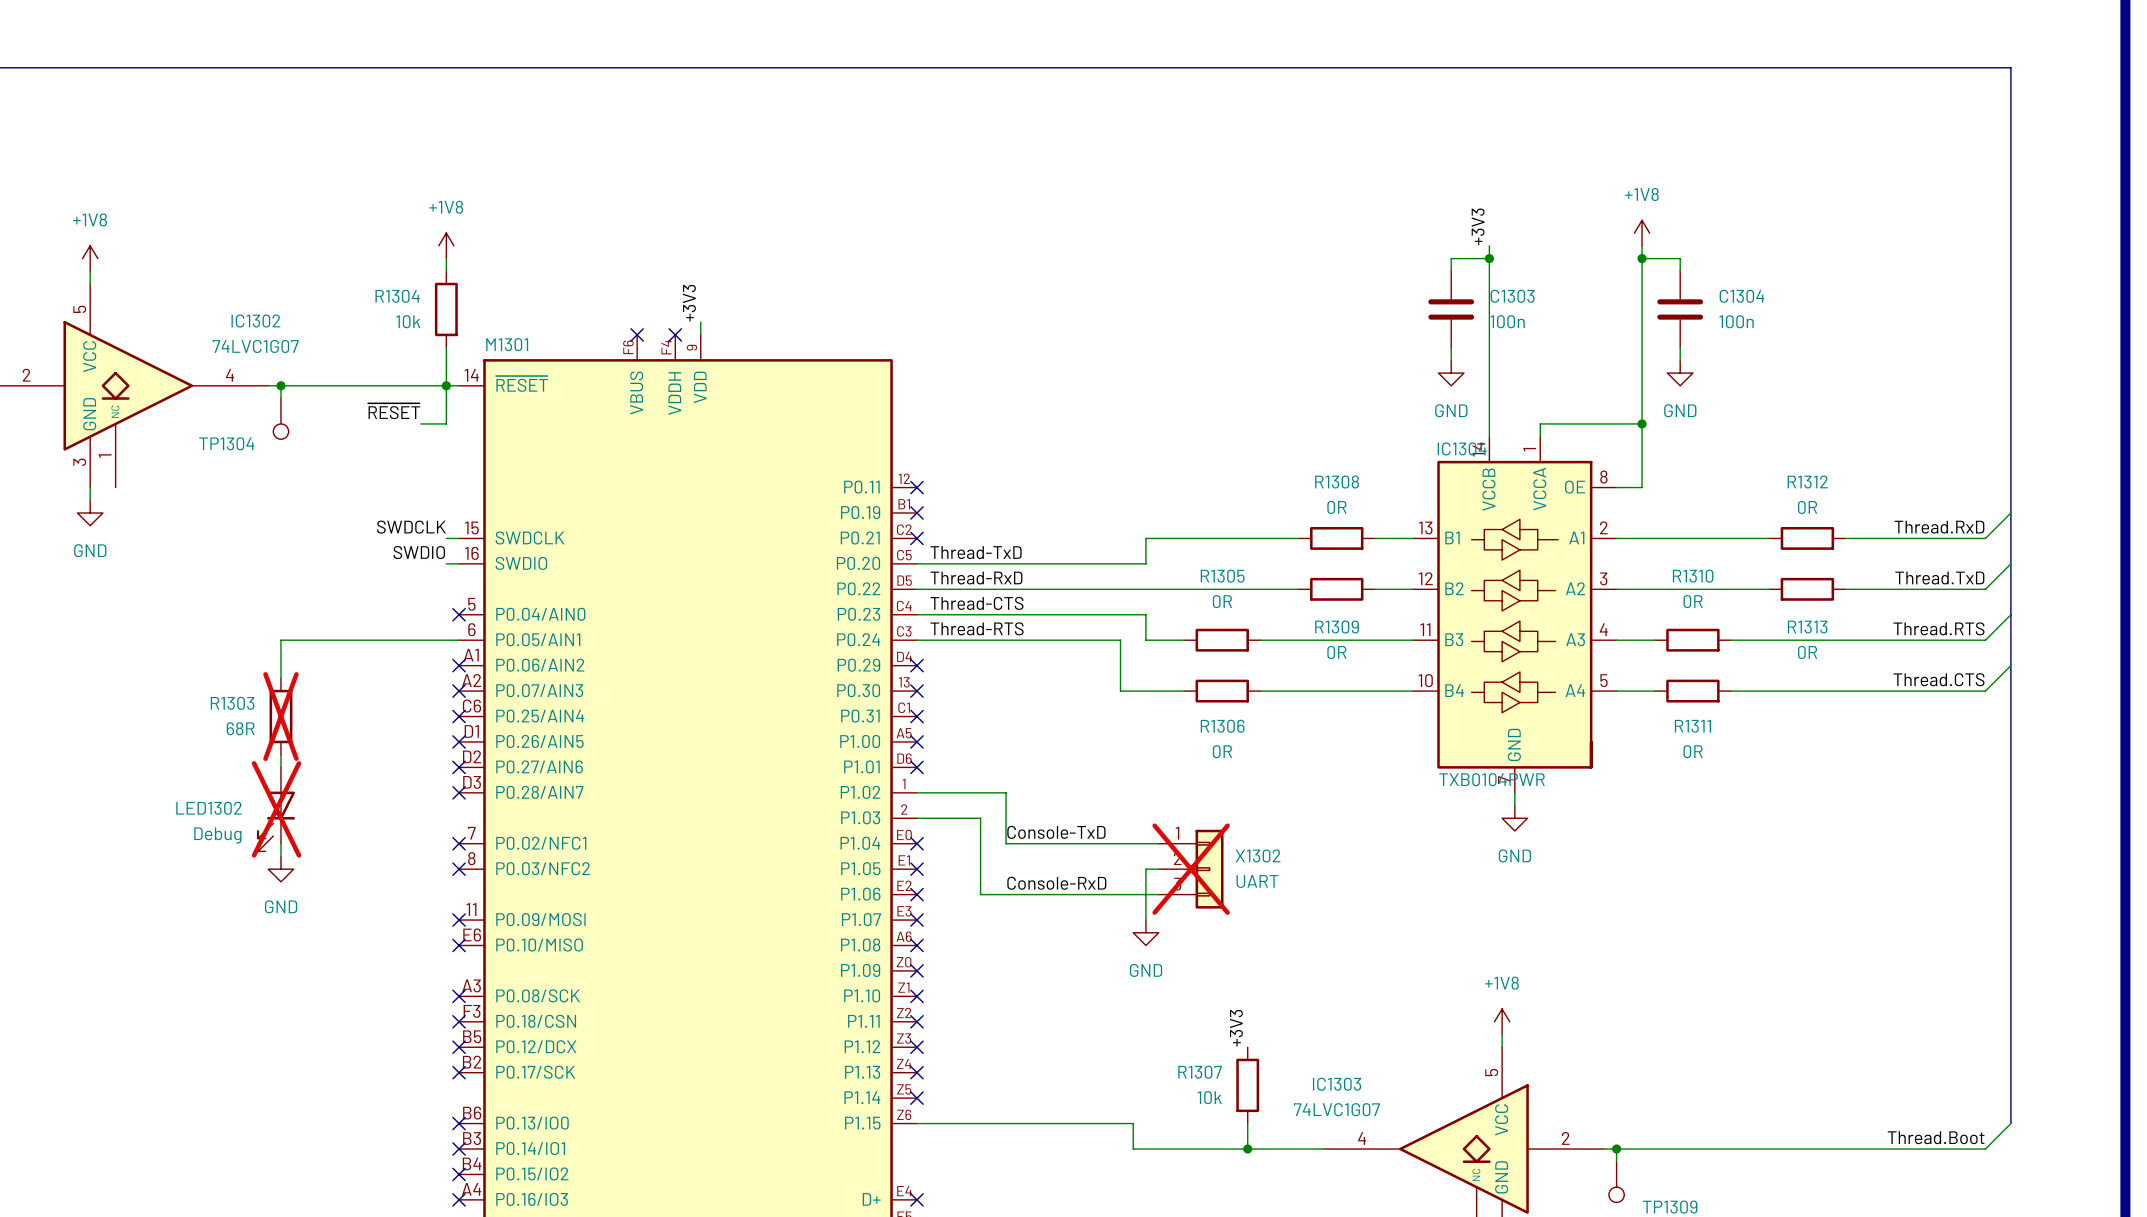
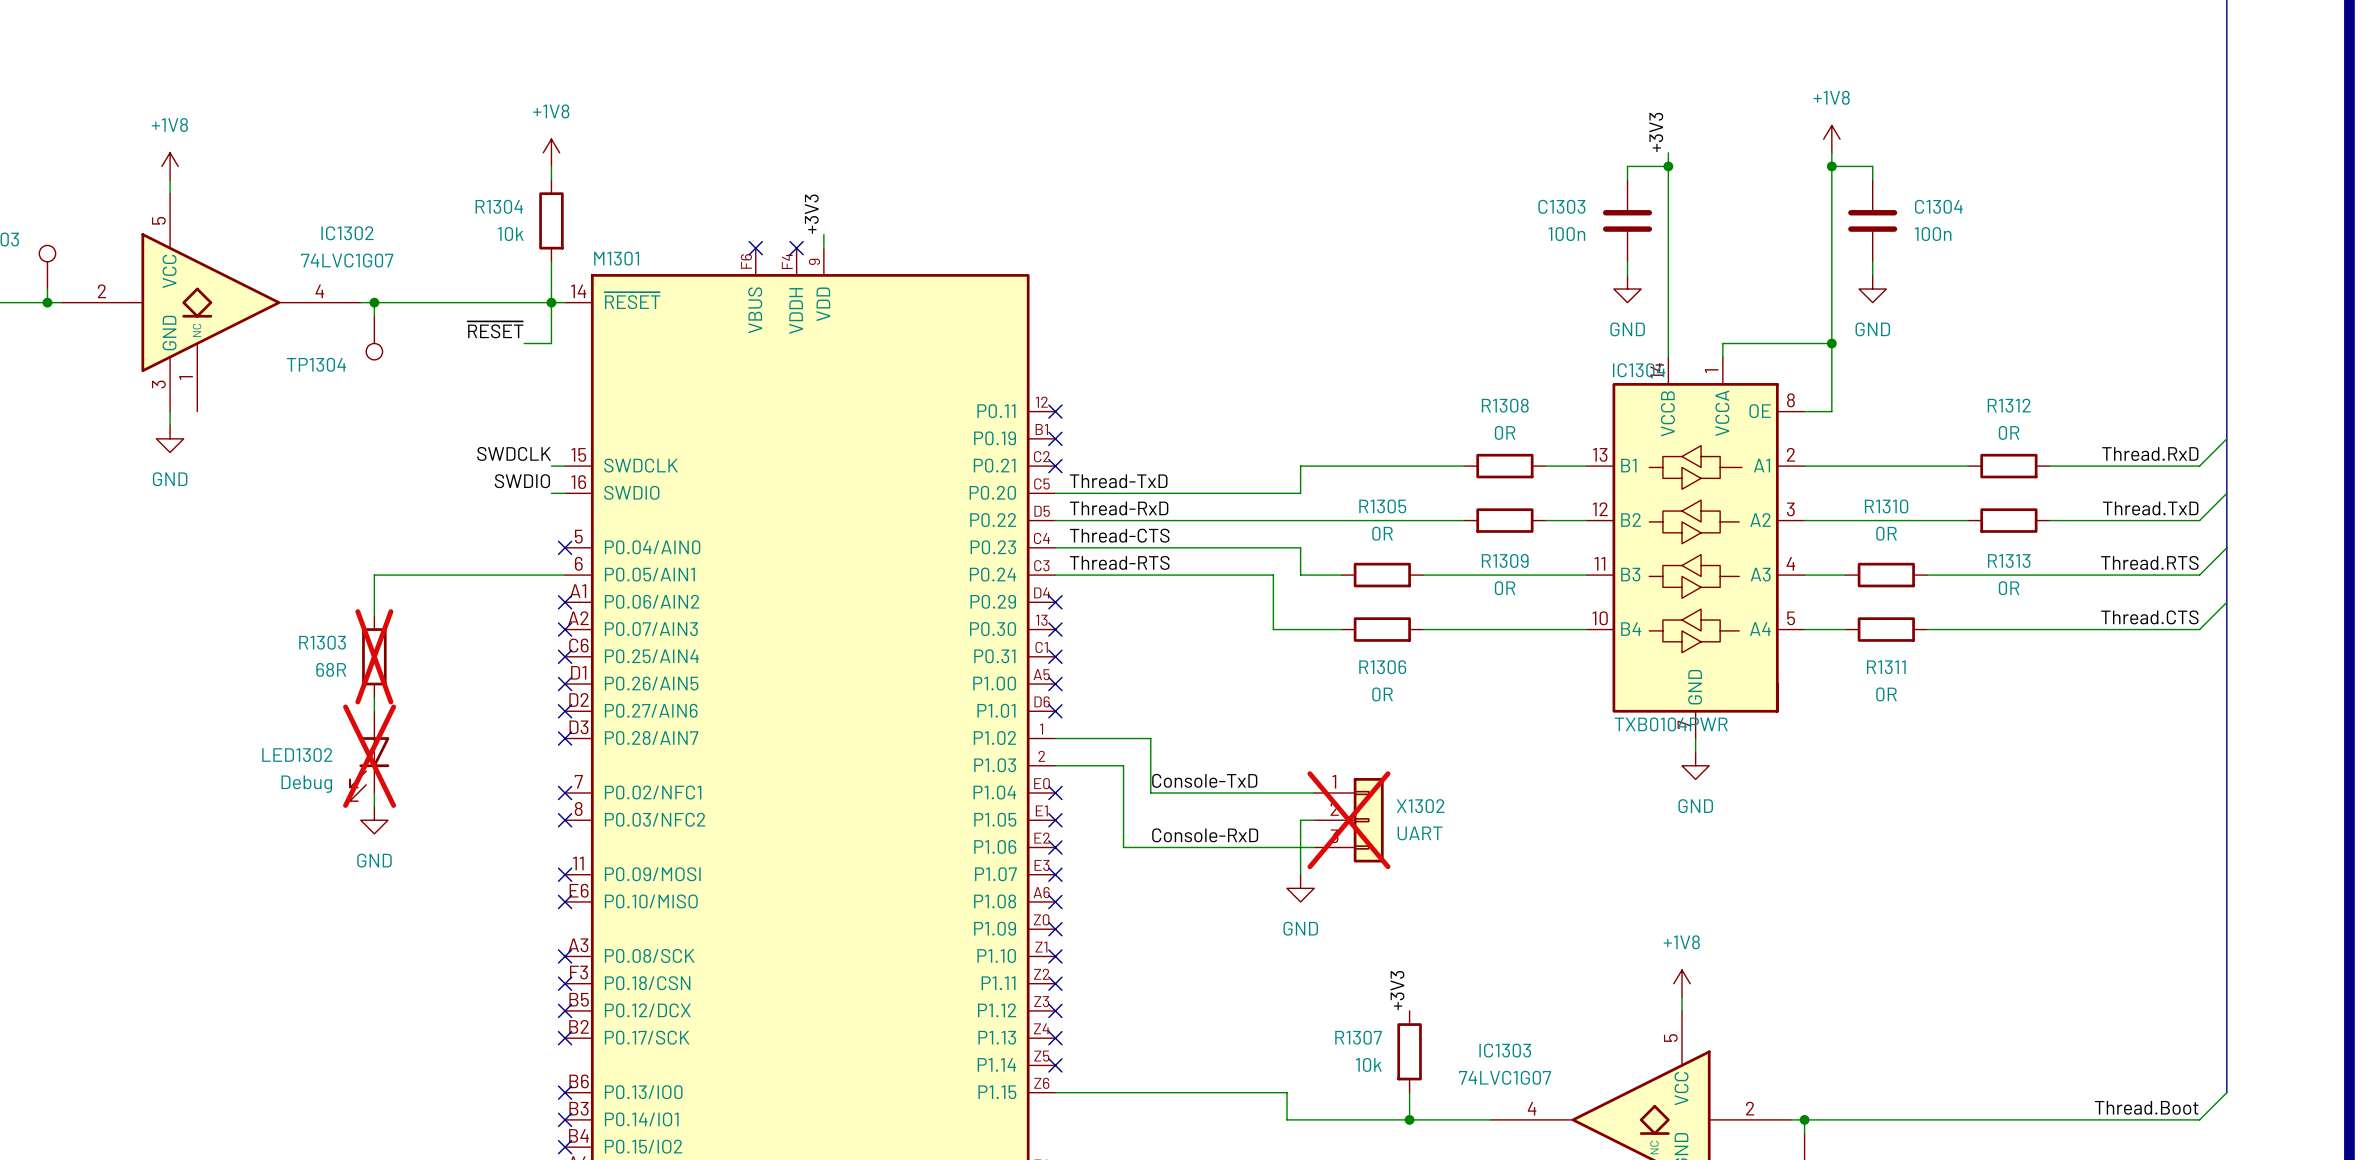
C1303 name position: C1303 (1512, 296) -> C1303 (1561, 206)
C1303 value position: 100n (1507, 321) -> 100n (1566, 234)

